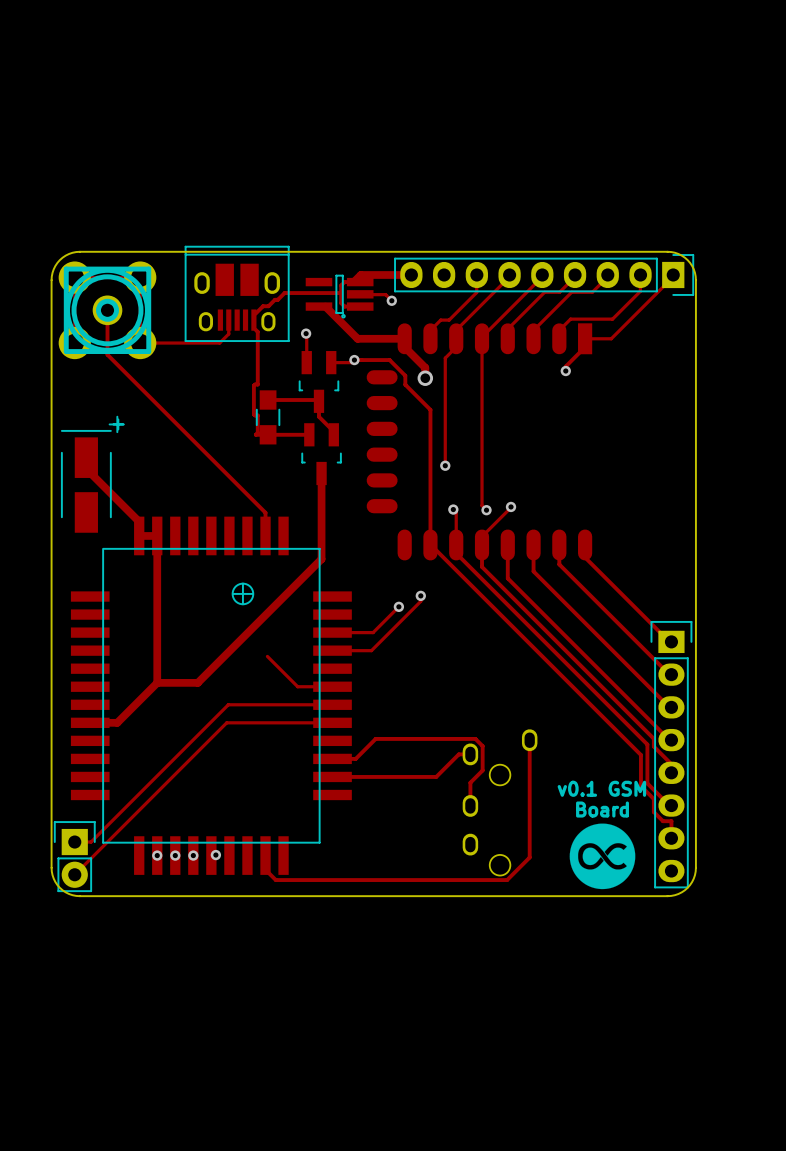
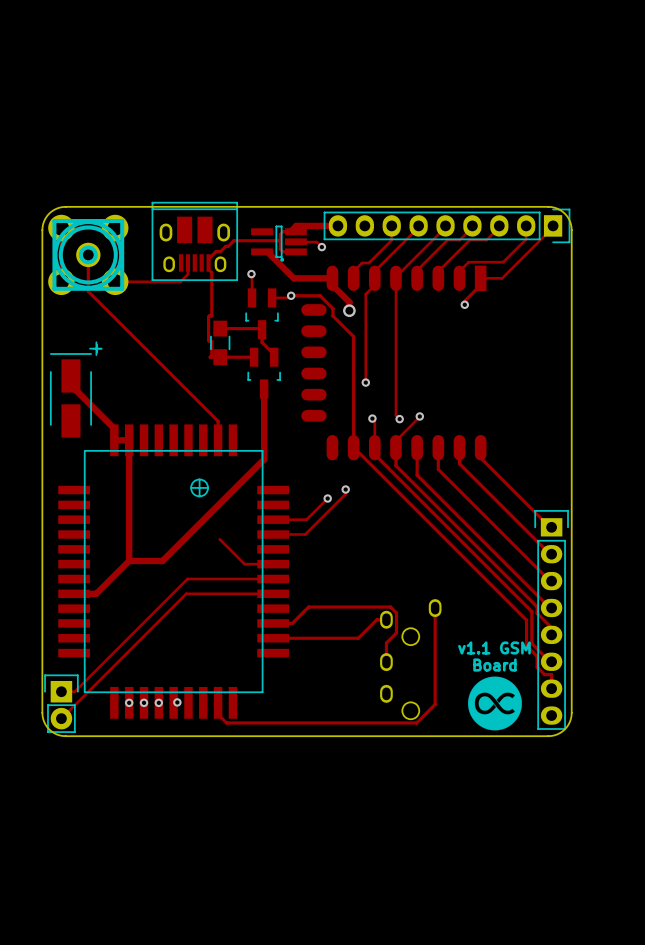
text: v0.1 GSM (601, 788) -> v1.1 GSM (494, 647)

